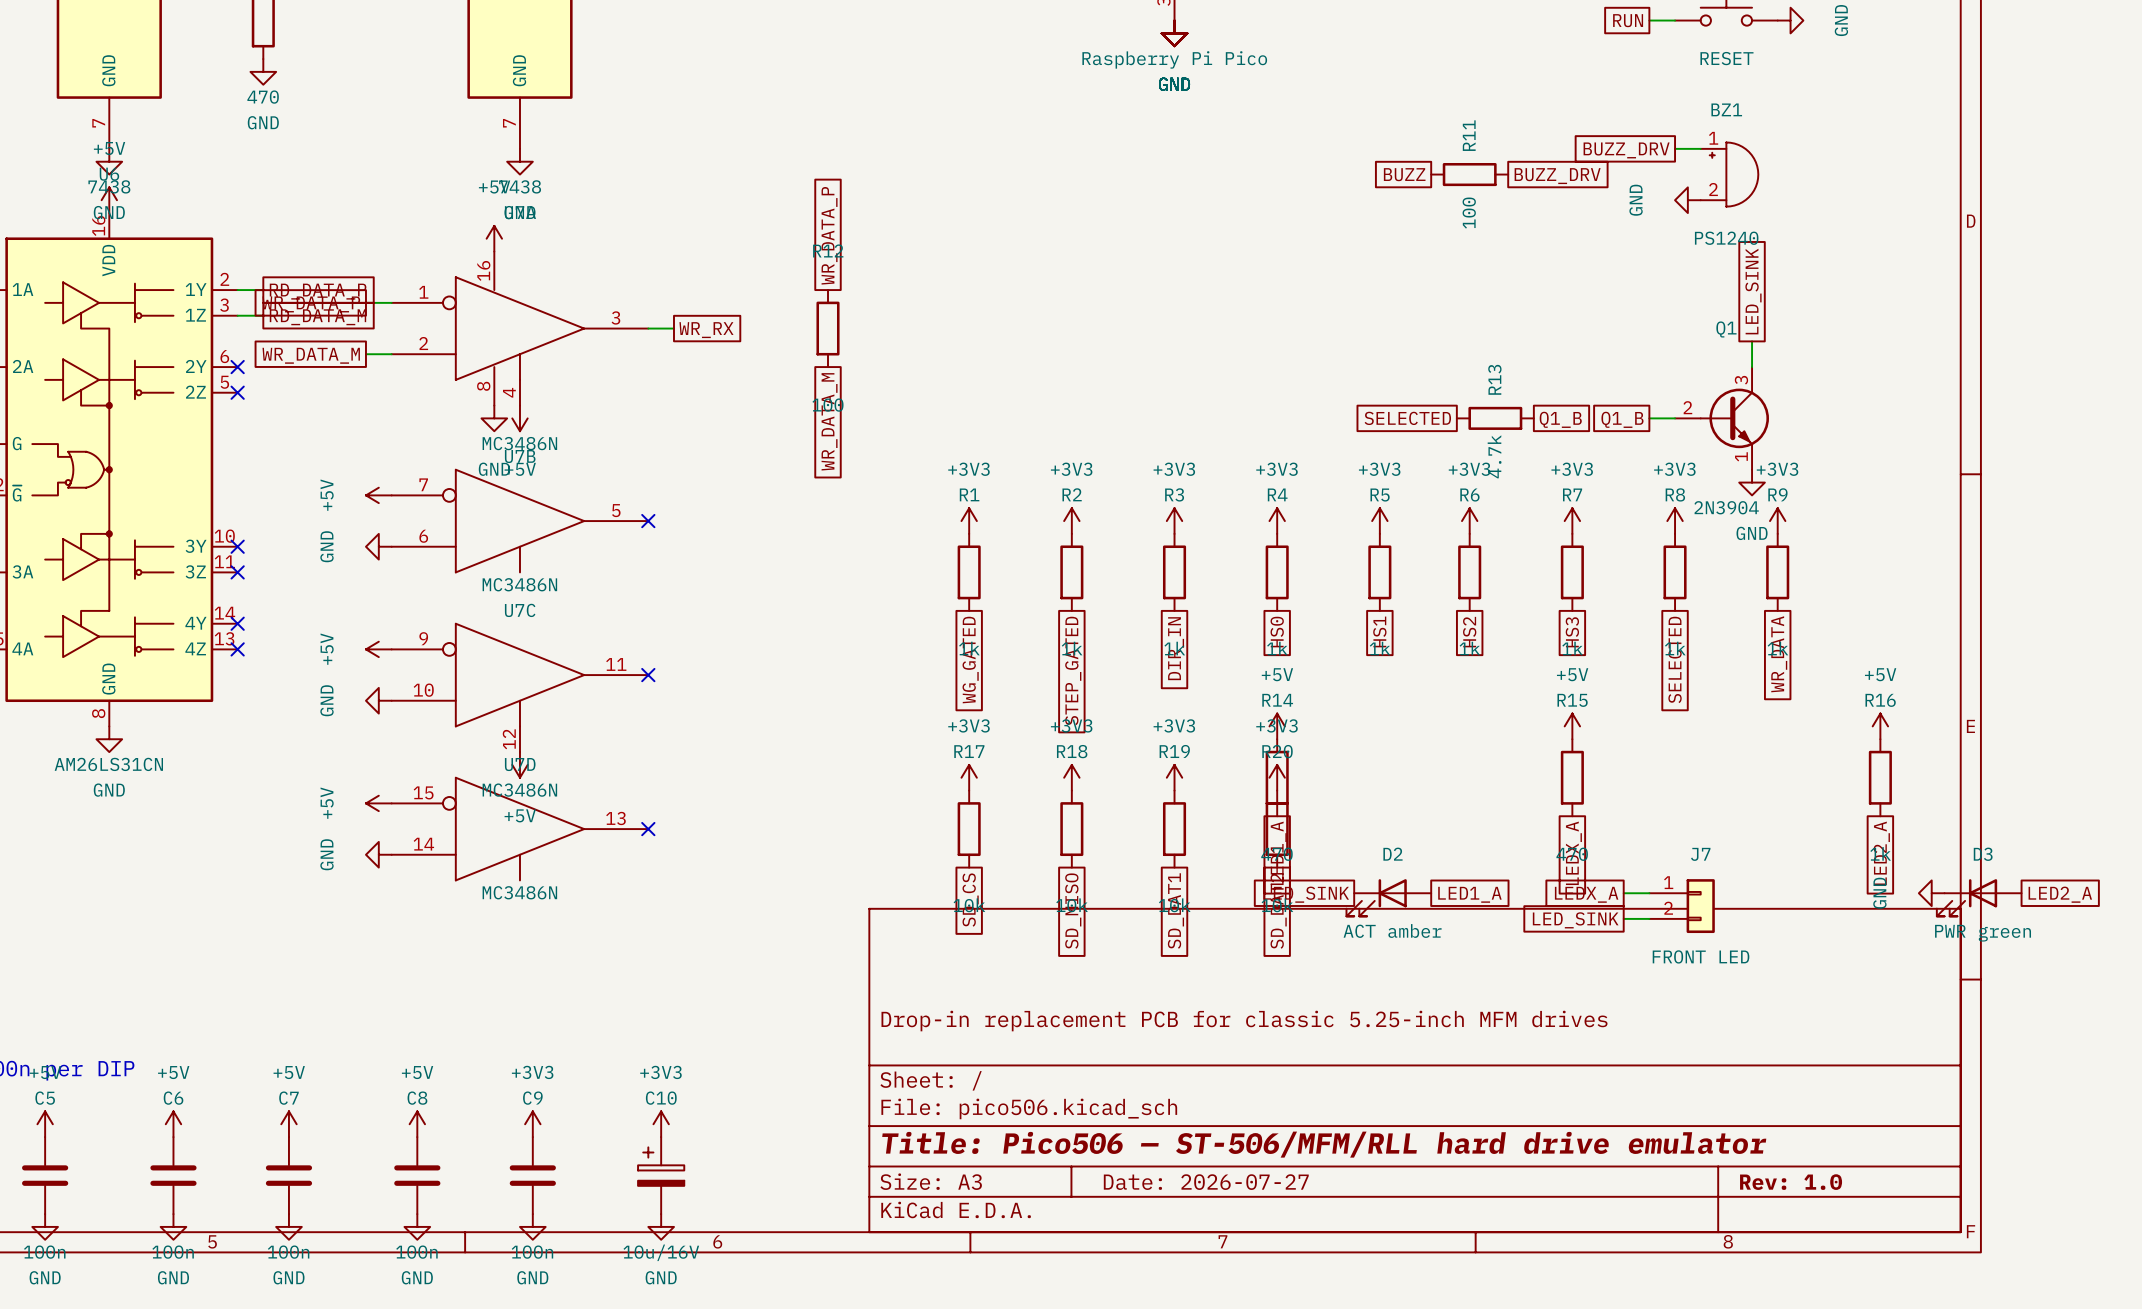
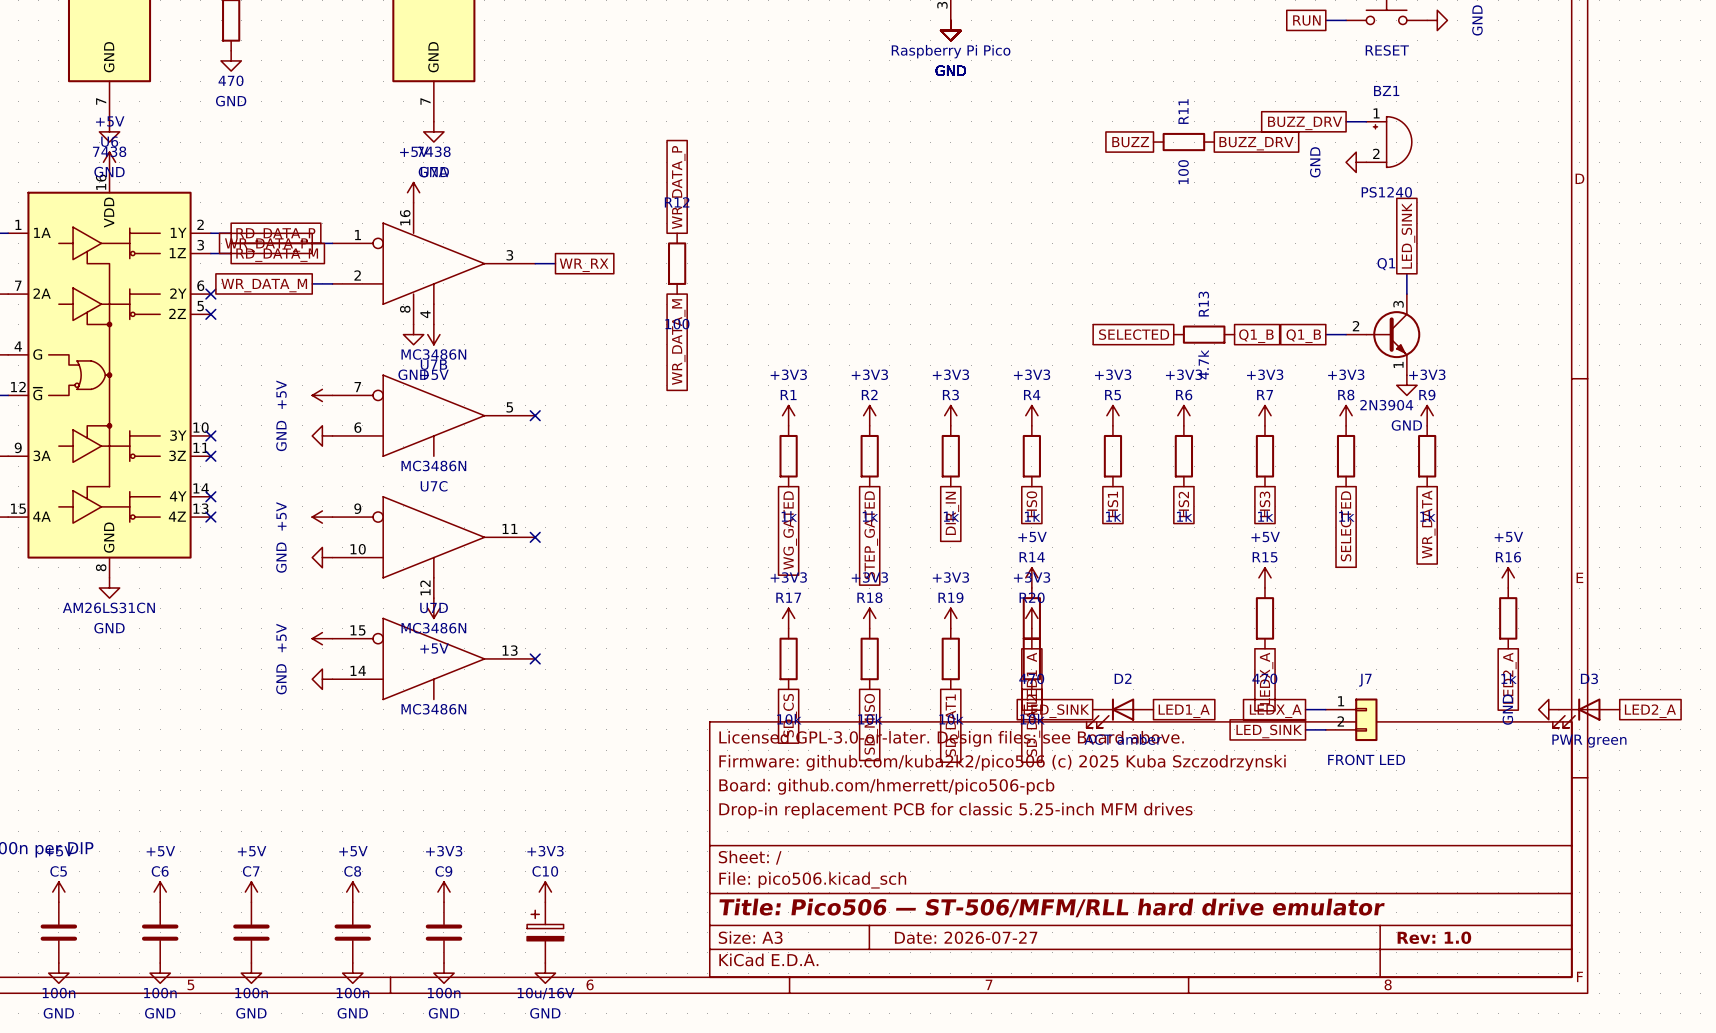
title block: none -> Licensed GPL-3.0-or-later. Design files: see Board above. (951, 738)
title block: none -> Firmware: github.com/kuba2k2/pico506 (c) 2025 Kuba Szczodrzynski (1002, 762)
title block: none -> Board: github.com/hmerrett/pico506-pcb (886, 786)

